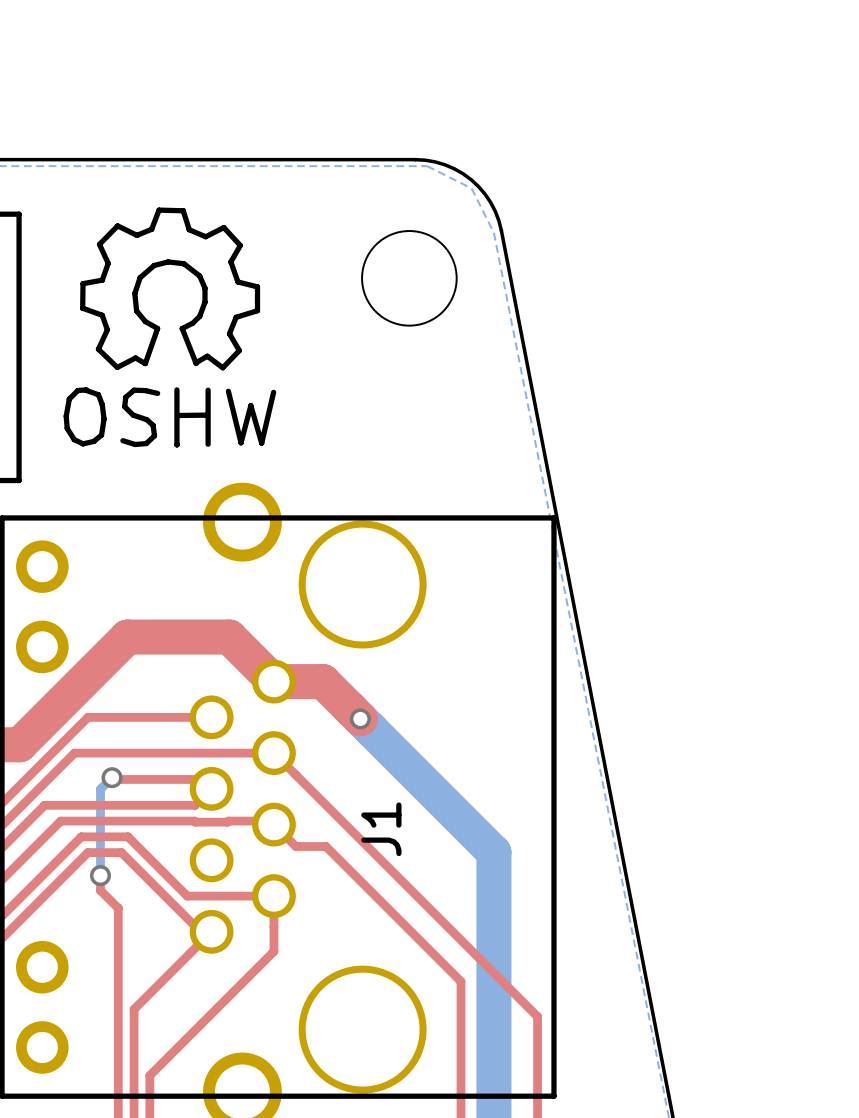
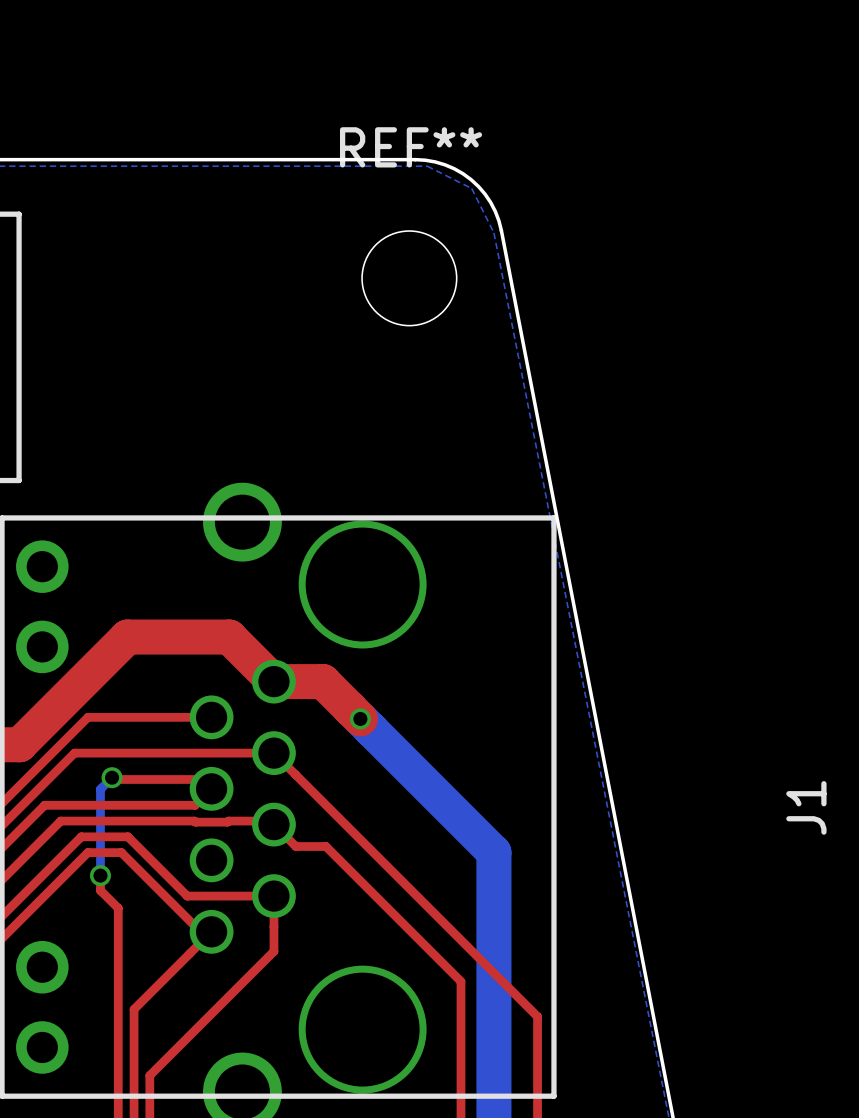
REF** name: none -> REF** (411, 147)
drawing: [63, 207, 277, 448] -> none
J1 name position: J1 (381, 829) -> J1 (806, 807)

